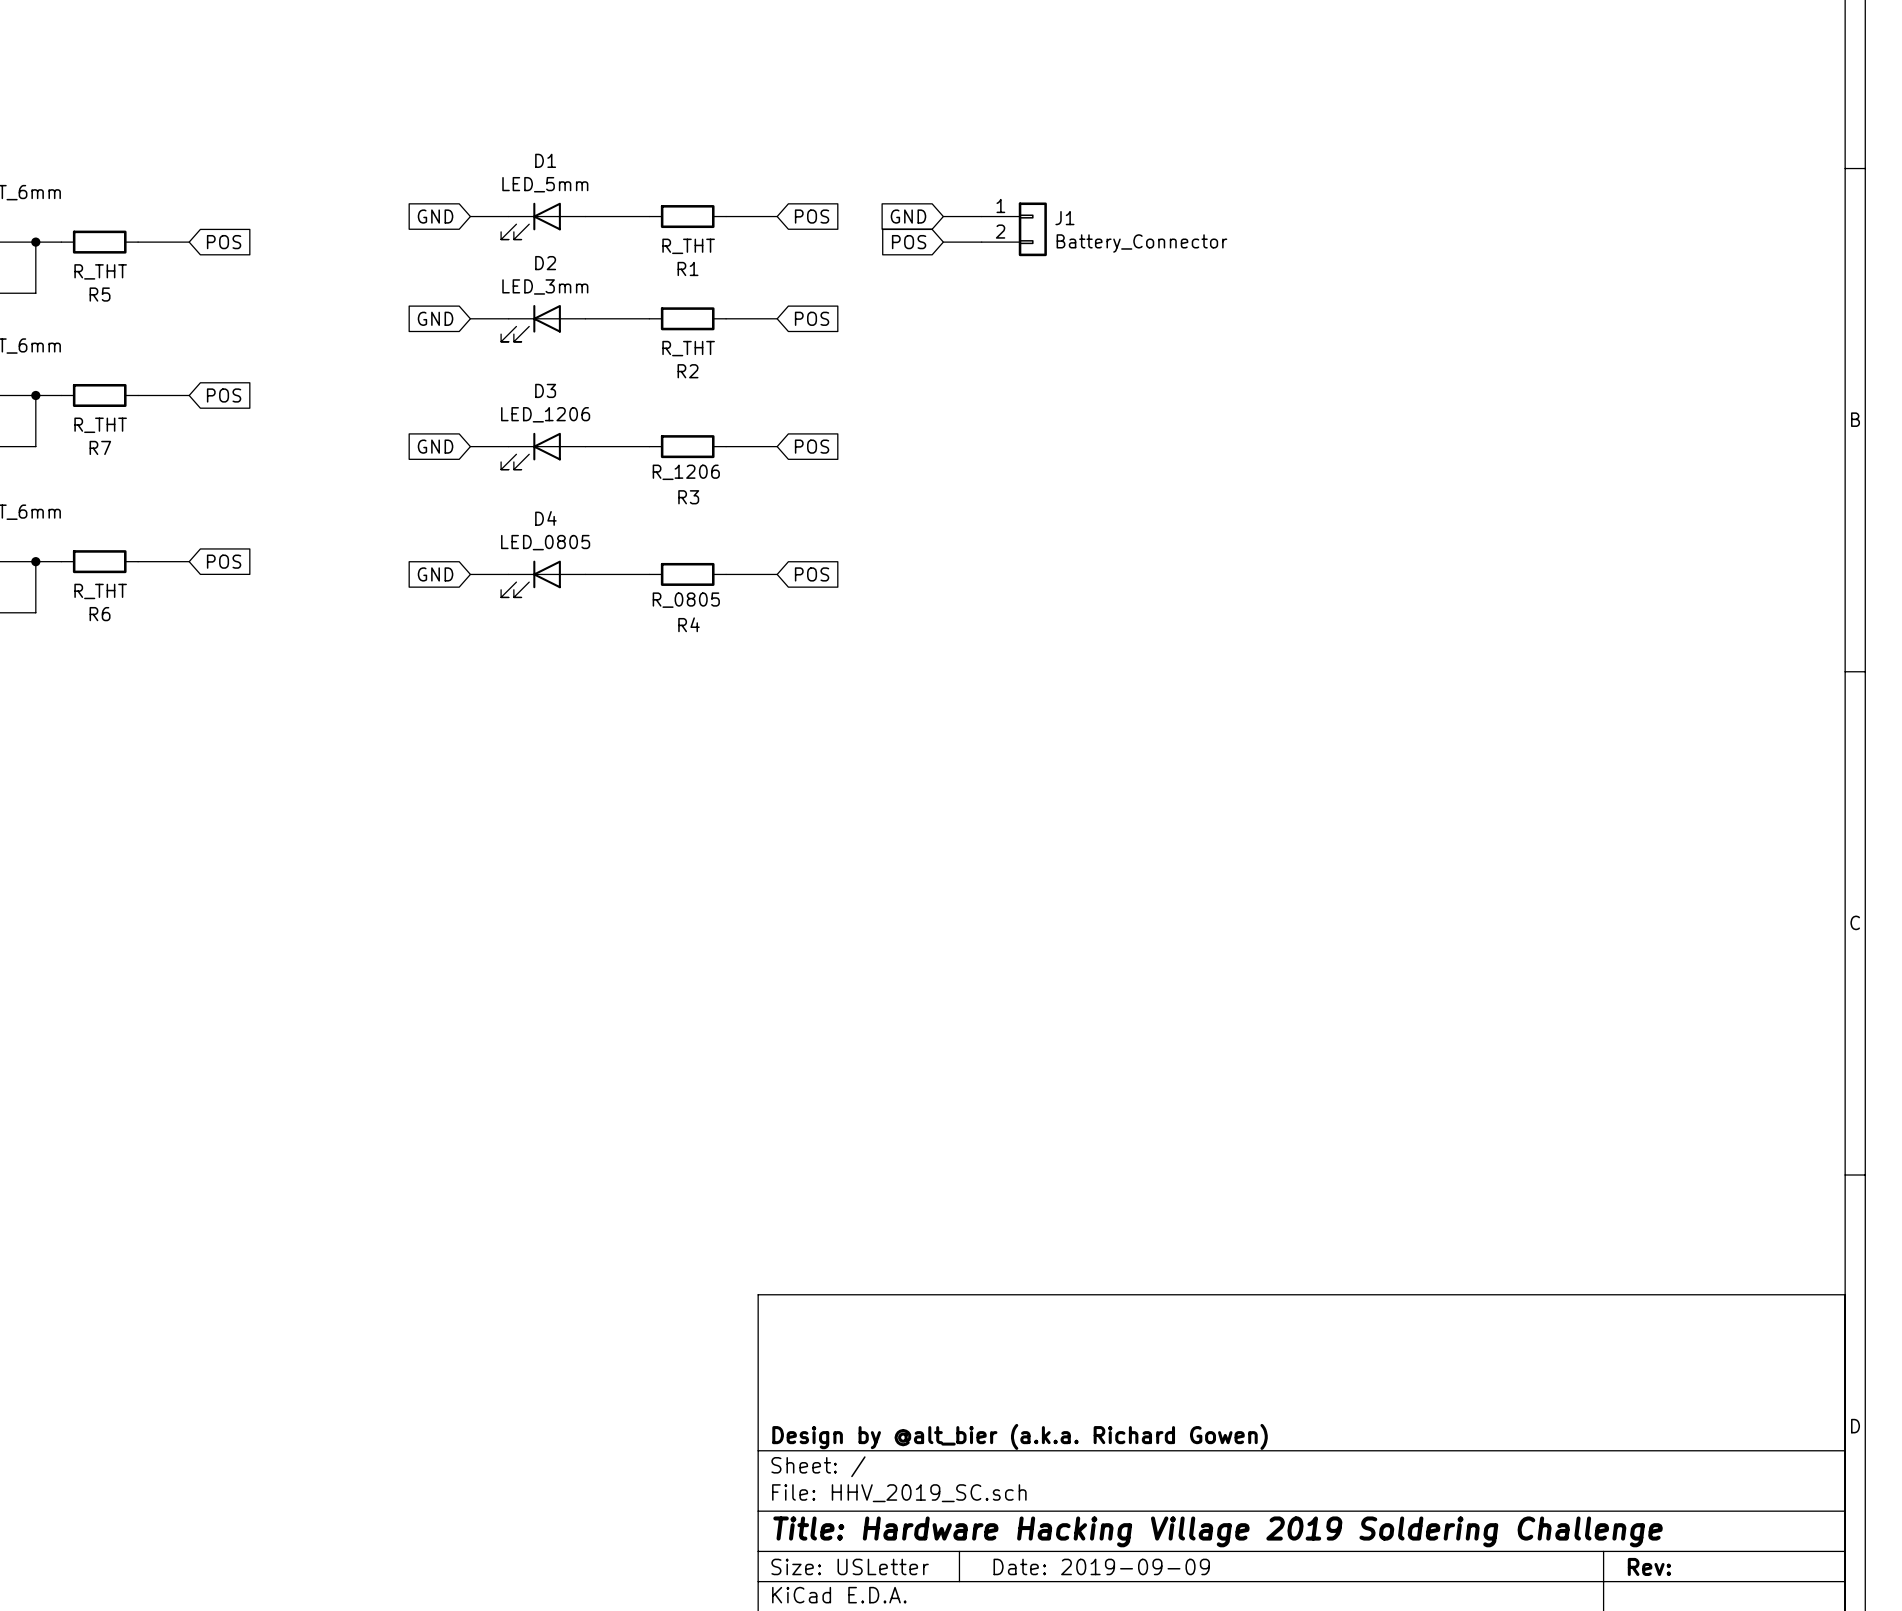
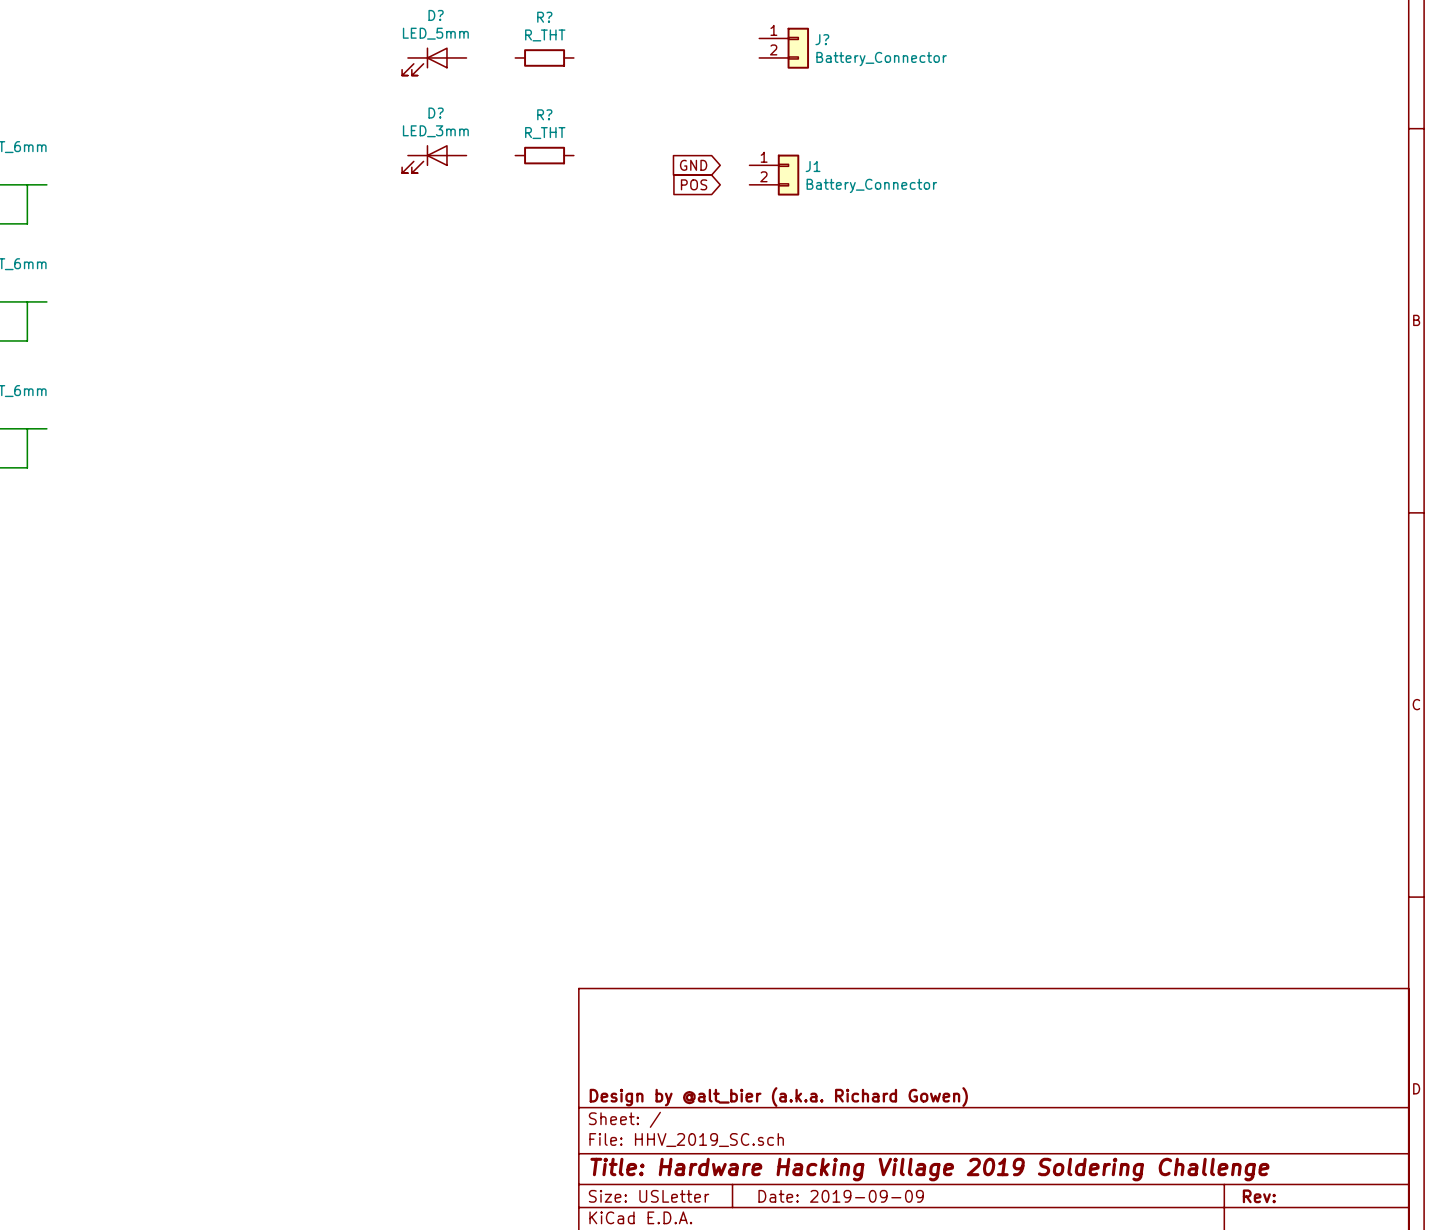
J?: none -> Battery_Connector (784, 48)
R?: none -> R_THT (544, 57)
D?: none -> LED_5mm (434, 61)
R?: none -> R_THT (544, 155)
D?: none -> LED_3mm (434, 159)
global label: GND (435, 216) -> none
wire: (470, 216) (508, 216) -> none
wire: (585, 216) (649, 216) -> none
R1: R_THT (687, 216) -> none
wire: (726, 216) (777, 216) -> none
global label: POS (812, 216) -> none
wire: (943, 216) (981, 216) -> none
D1: LED_5mm (543, 221) -> none
junction: (35, 242) -> none
R5: R_THT (99, 242) -> none
wire: (138, 242) (189, 242) -> none
global label: POS (224, 242) -> none
wire: (943, 242) (981, 242) -> none
global label: GND (435, 318) -> none
wire: (470, 318) (508, 318) -> none
wire: (585, 318) (649, 318) -> none
R2: R_THT (687, 318) -> none
wire: (726, 318) (777, 318) -> none
global label: POS (812, 318) -> none
D2: LED_3mm (543, 323) -> none
junction: (35, 395) -> none
R7: R_THT (99, 395) -> none
wire: (138, 395) (189, 395) -> none
global label: POS (224, 395) -> none
global label: GND (435, 446) -> none
wire: (470, 446) (508, 446) -> none
wire: (585, 446) (649, 446) -> none
R3: R_1206 (687, 446) -> none
wire: (726, 446) (777, 446) -> none
global label: POS (812, 446) -> none
D3: LED_1206 (543, 451) -> none
junction: (35, 561) -> none
R6: R_THT (99, 561) -> none
wire: (138, 561) (189, 561) -> none
global label: POS (224, 561) -> none
global label: GND (435, 574) -> none
wire: (470, 574) (508, 574) -> none
wire: (585, 574) (649, 574) -> none
R4: R_0805 (687, 574) -> none
wire: (726, 574) (777, 574) -> none
global label: POS (812, 574) -> none
D4: LED_0805 (543, 579) -> none

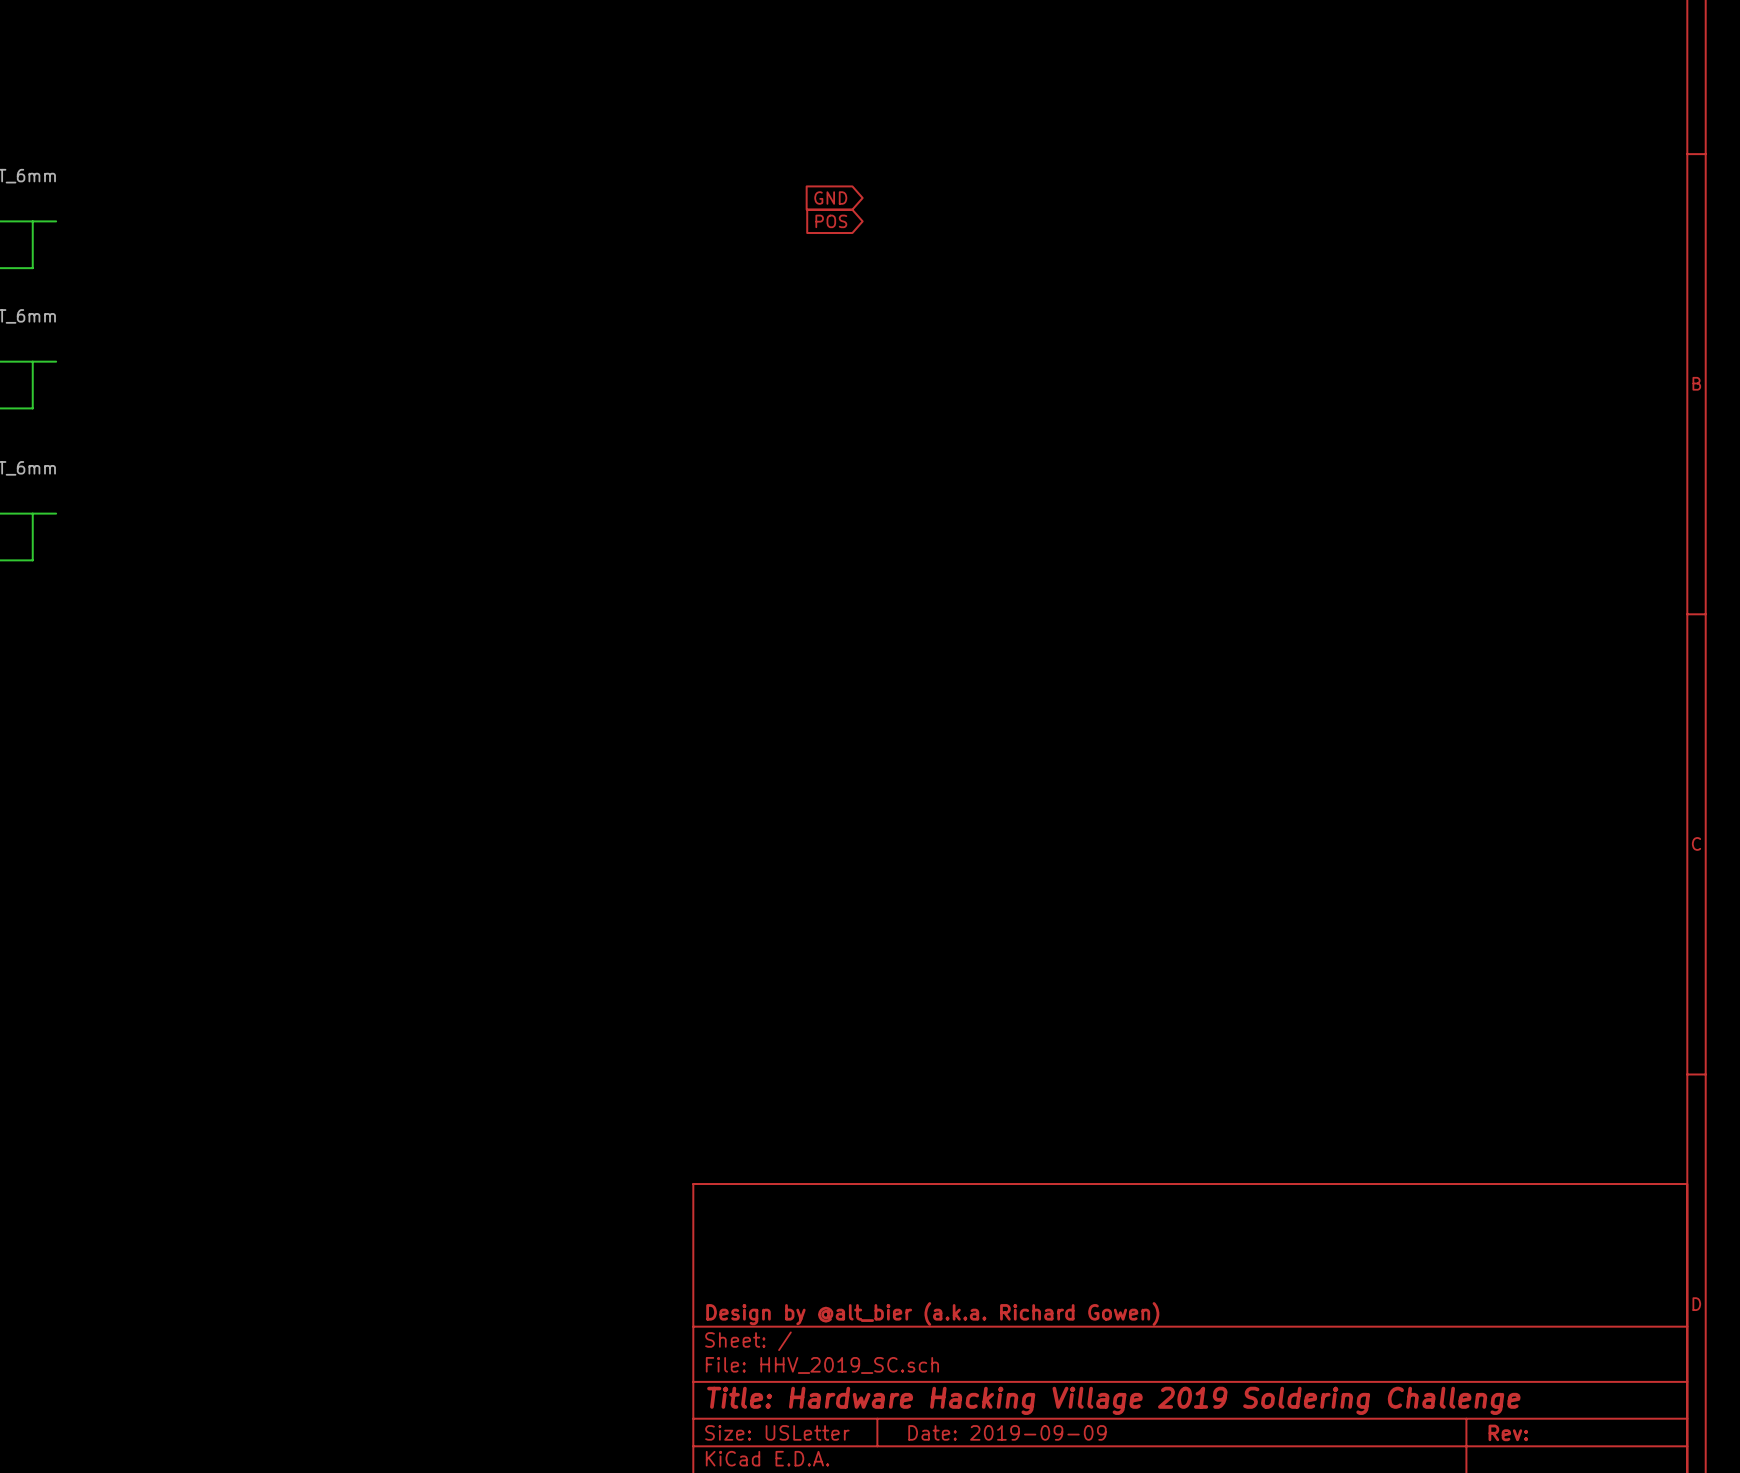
J?: Battery_Connector (784, 48) -> none
R?: R_THT (544, 57) -> none
D?: LED_5mm (434, 61) -> none
R?: R_THT (544, 155) -> none
D?: LED_3mm (434, 159) -> none
J1: Battery_Connector (774, 175) -> none

